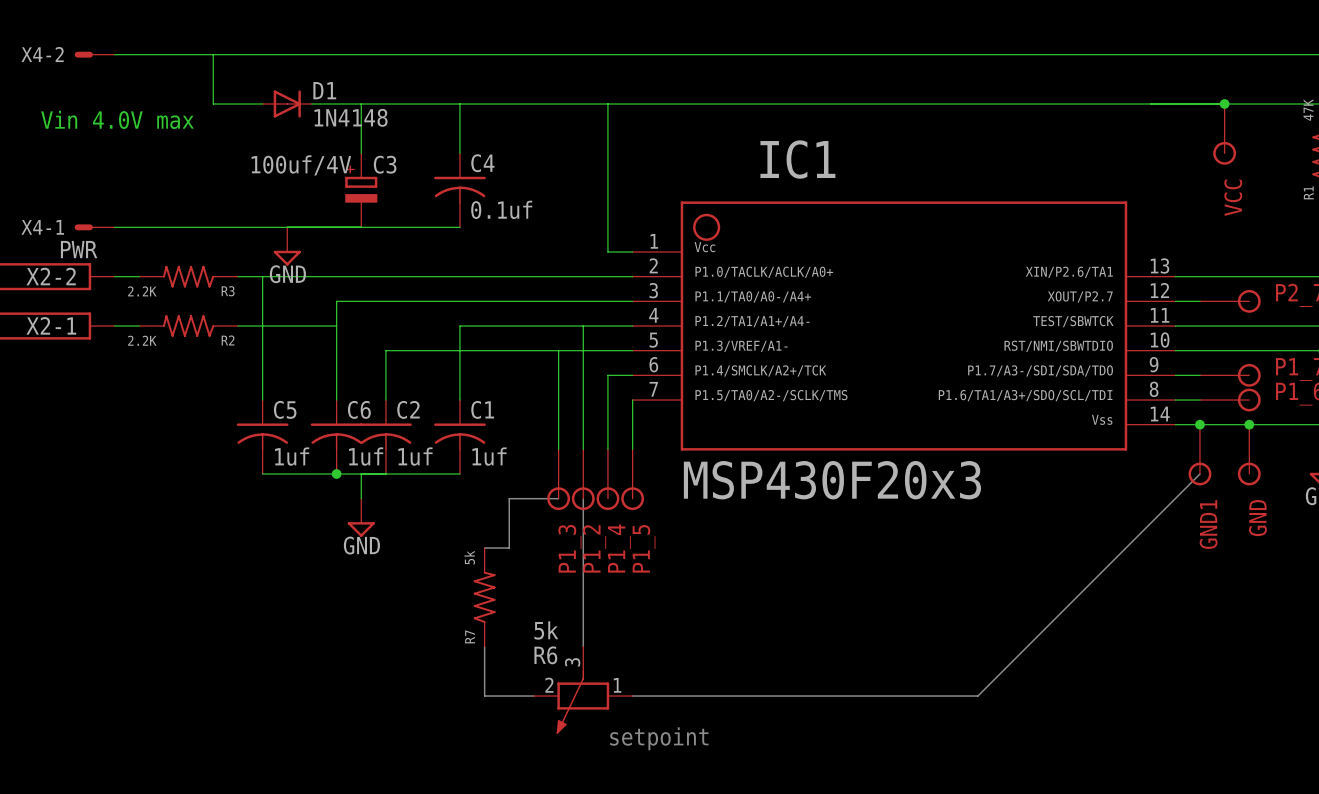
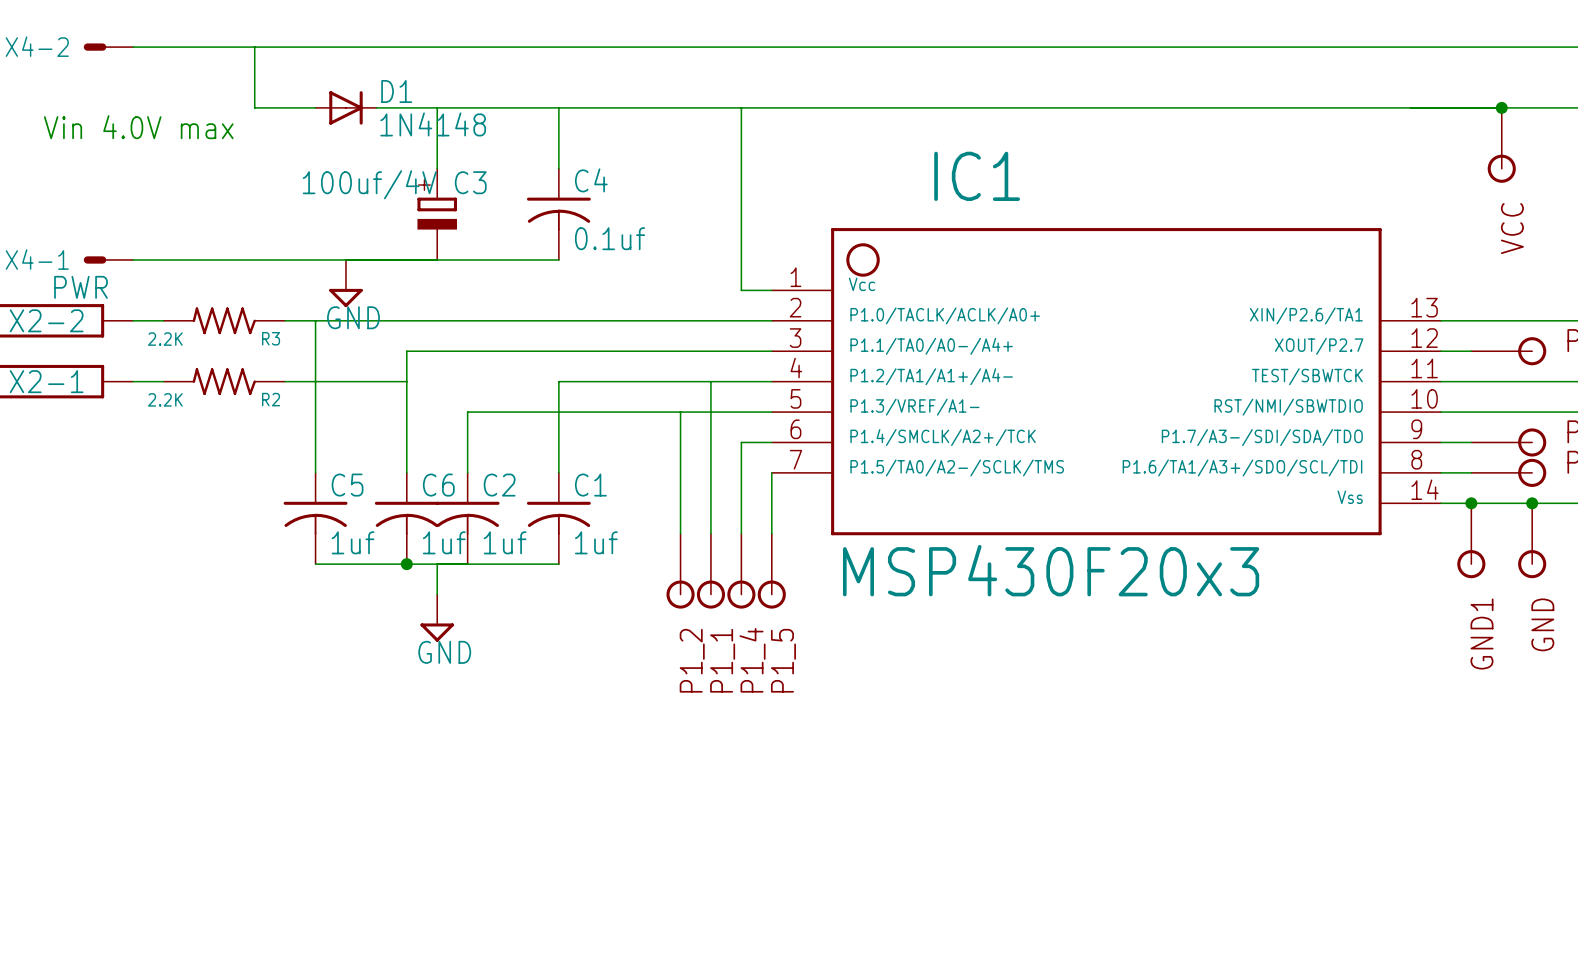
line: (1199, 474) (977, 696) (632, 696) -> none
line: (558, 498) (509, 498) (509, 548) (484, 548) -> none
line: (583, 498) (583, 646) -> none
P1_3 name: P1_3 (569, 548) -> P1_2 (692, 660)
P1_2 name: P1_2 (594, 548) -> P1_1 (722, 660)
R7: 5k (484, 597) -> none
line: (484, 646) (484, 696) (533, 696) -> none
R6: 5k (583, 690) -> none
text: setpoint (659, 738) -> none

